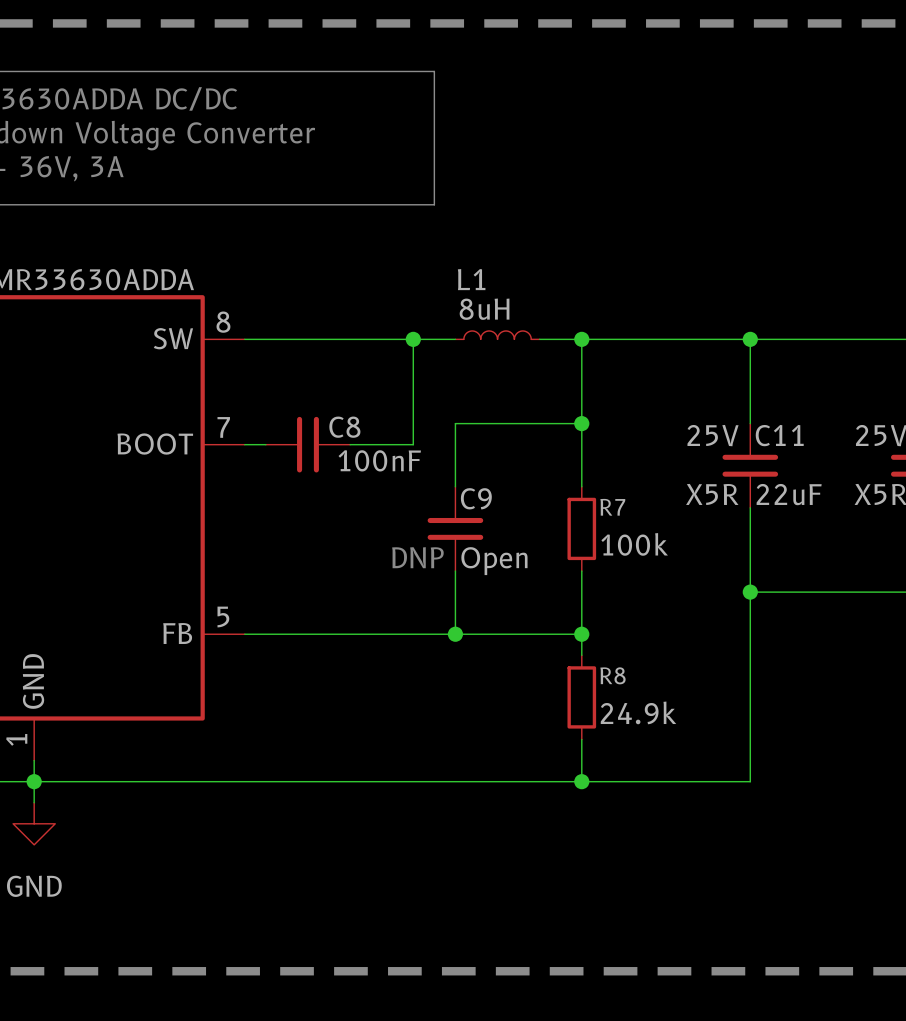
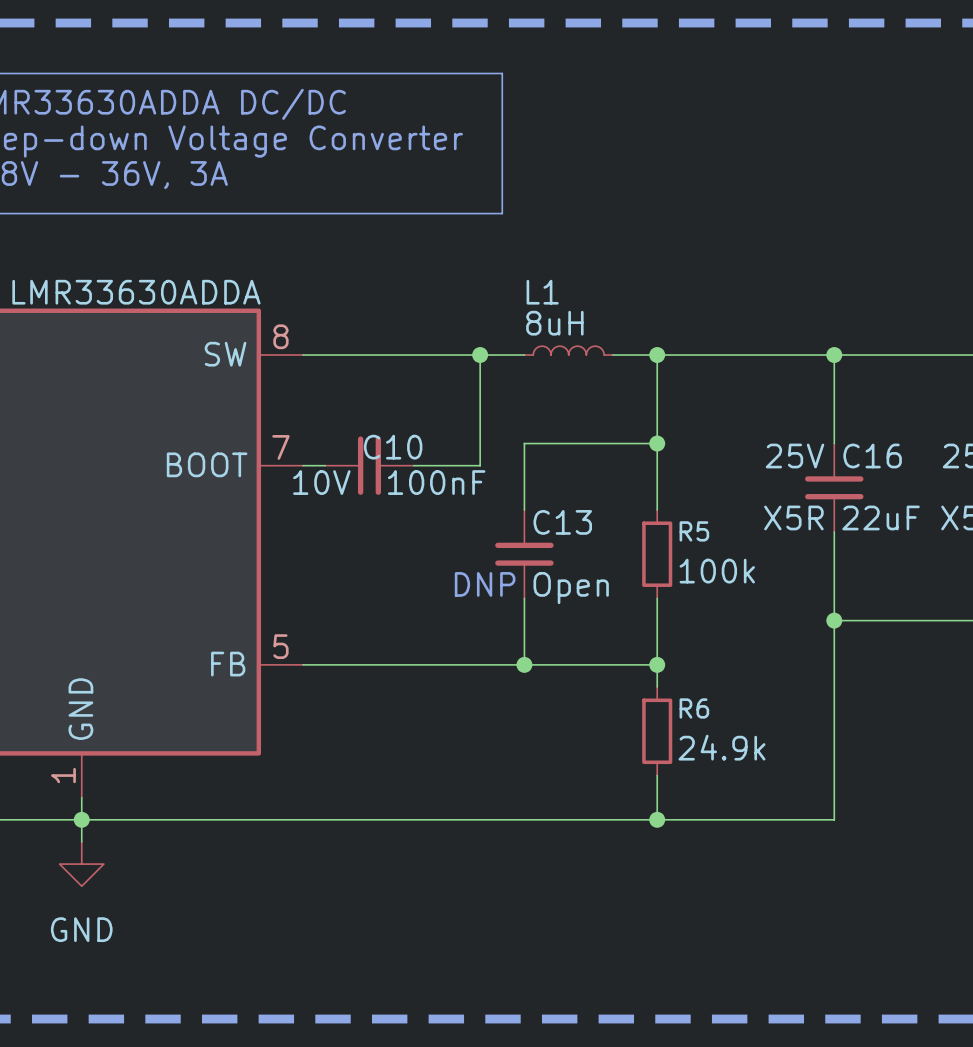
C8 name: C8 (344, 427) -> C10 (393, 447)
C11 name: C11 (779, 435) -> C16 (872, 456)
C8 text: none -> 10V (321, 482)
C9 name: C9 (476, 498) -> C13 (562, 522)
R7 name: R7 (612, 507) -> R5 (694, 531)
R8 name: R8 (612, 675) -> R6 (694, 708)

